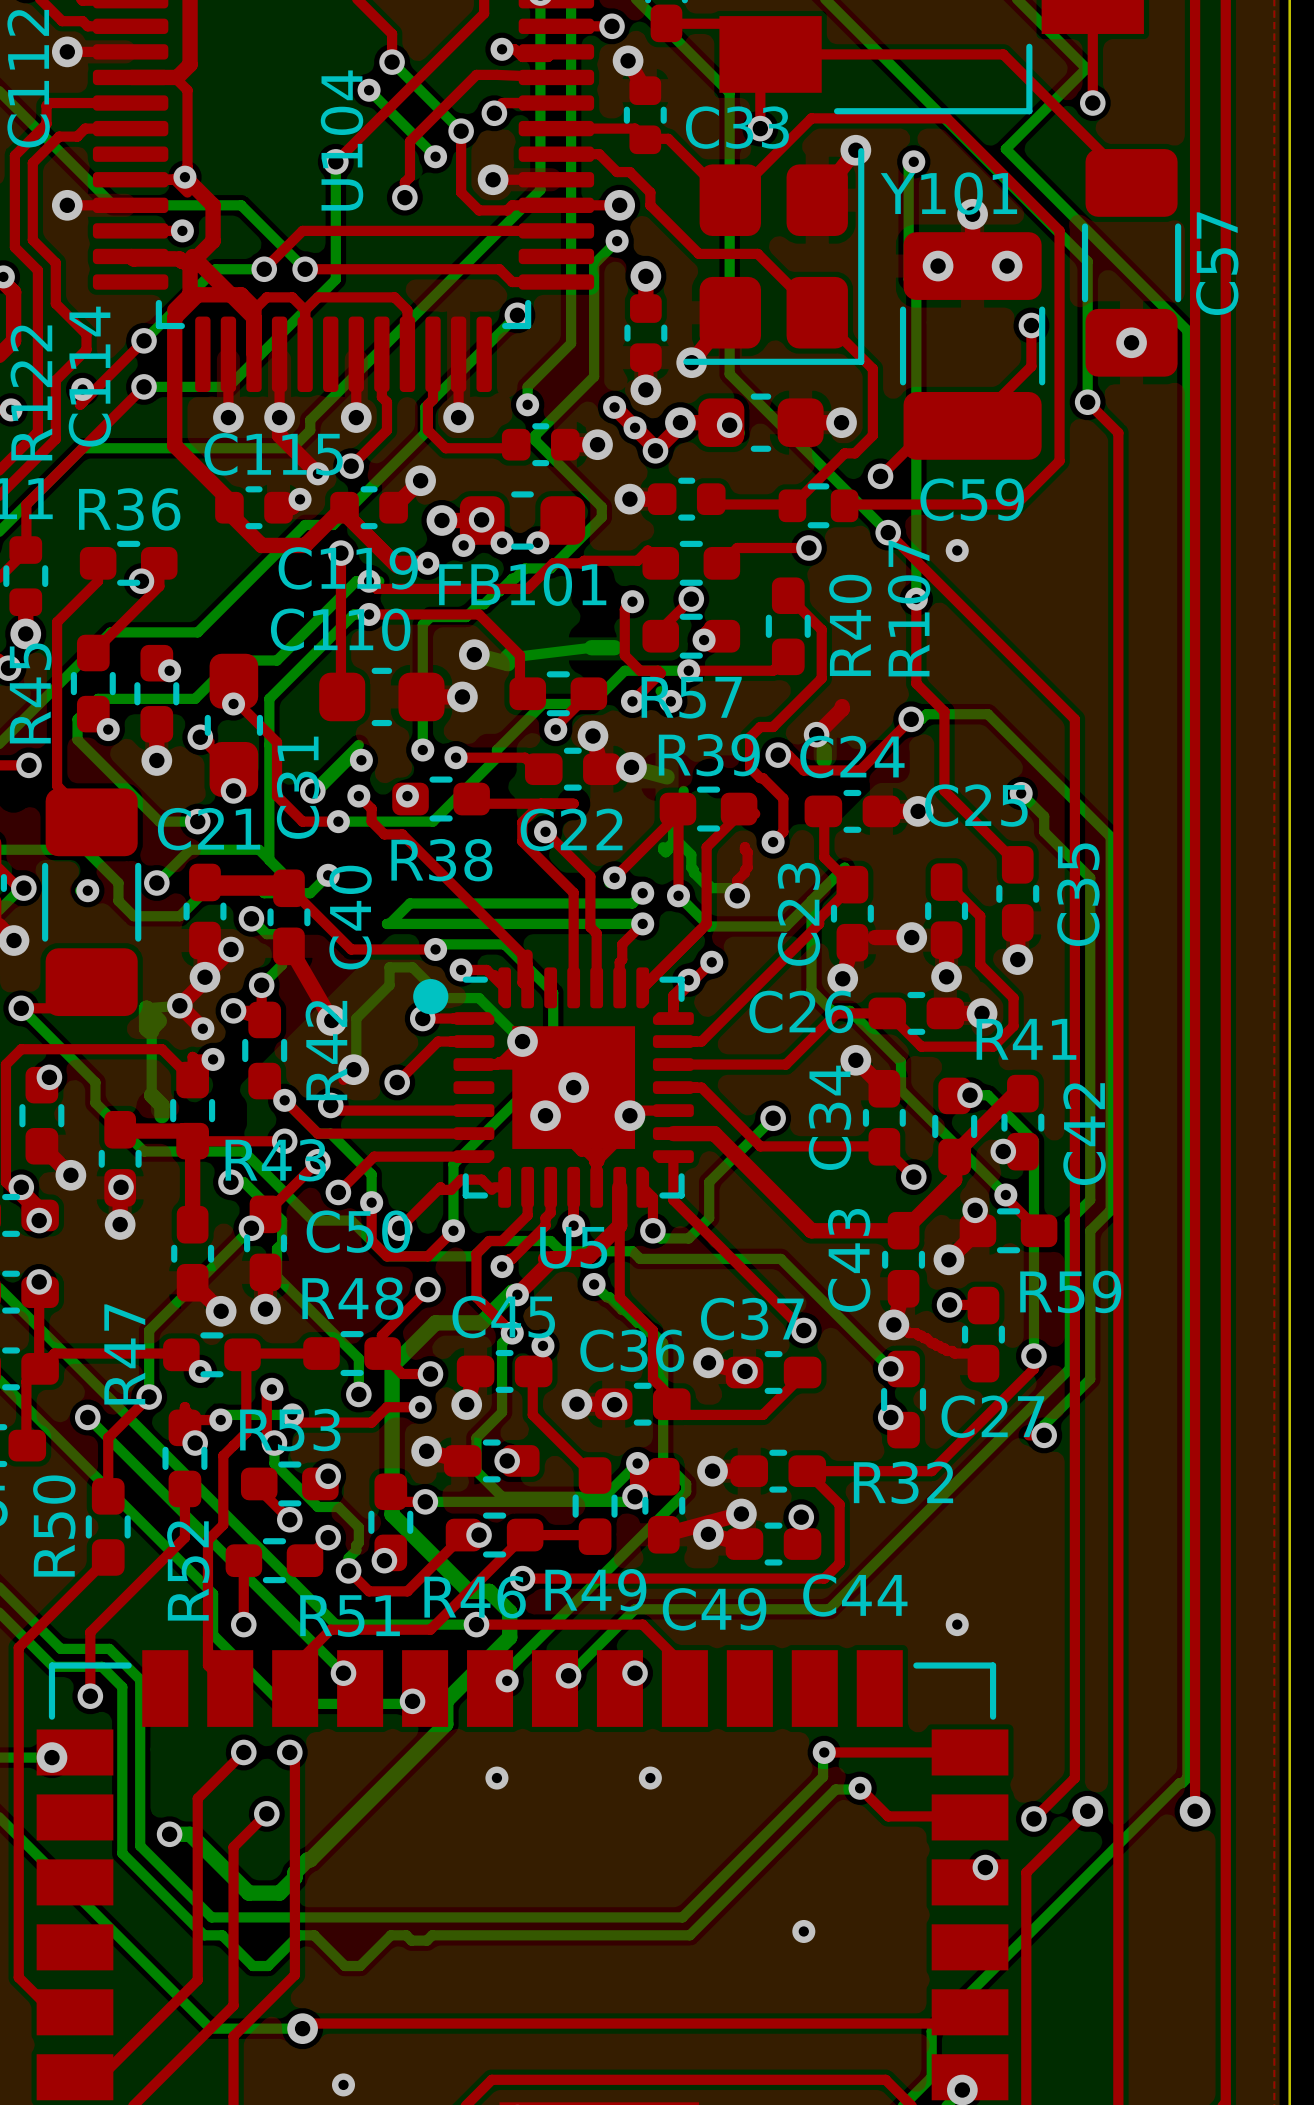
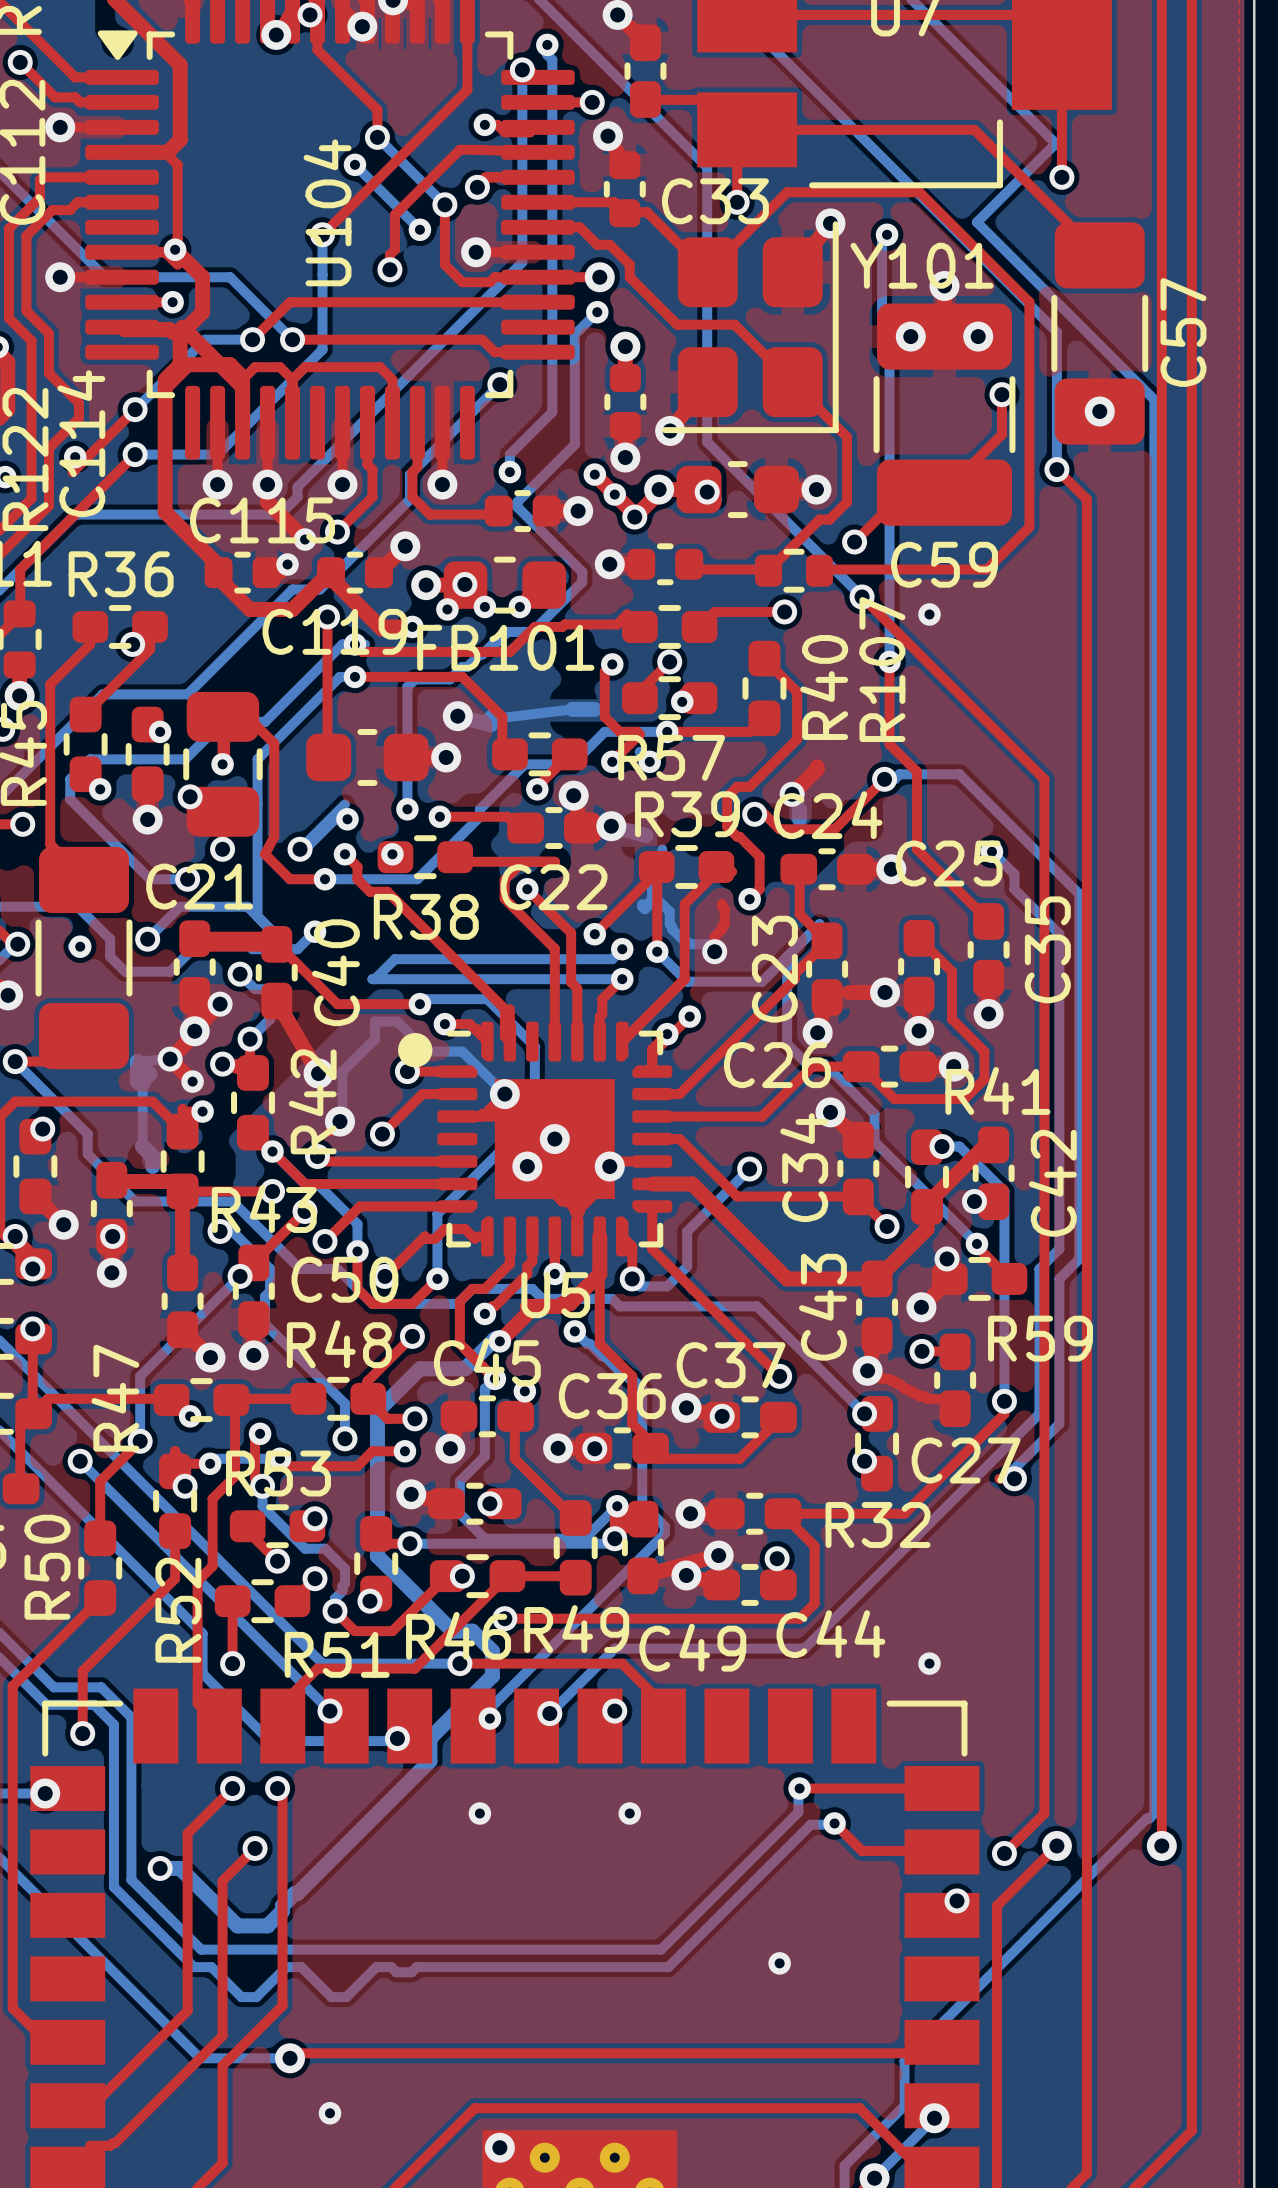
C110 name: C110 (340, 629) -> none
top track: (236, 701) (277, 742) (277, 796) -> (250, 719) (274, 743) (274, 836) (265, 854)
part: none -> (222, 764)
C31: (233, 725) -> none

